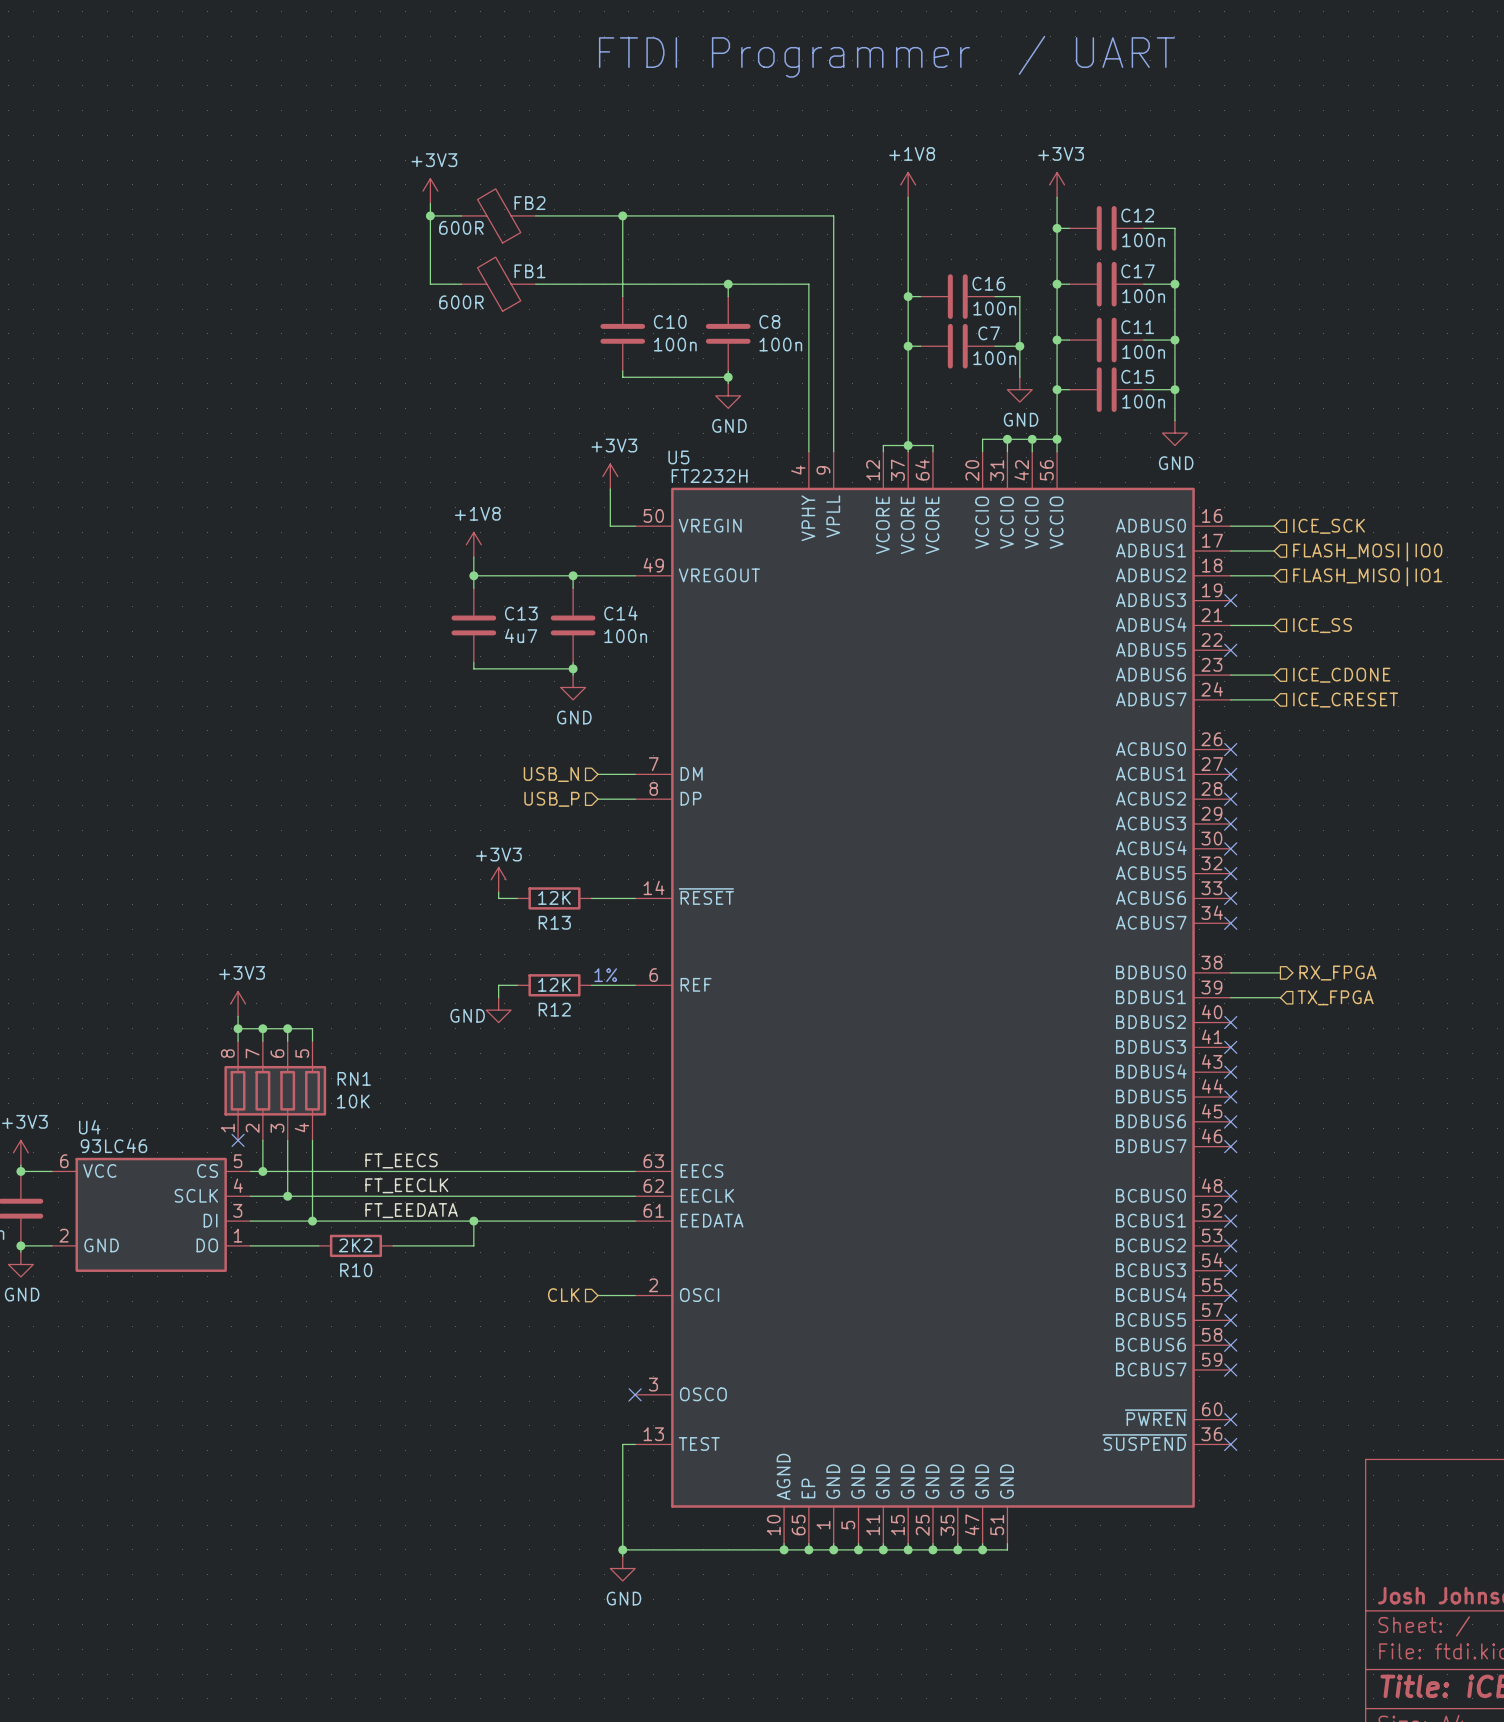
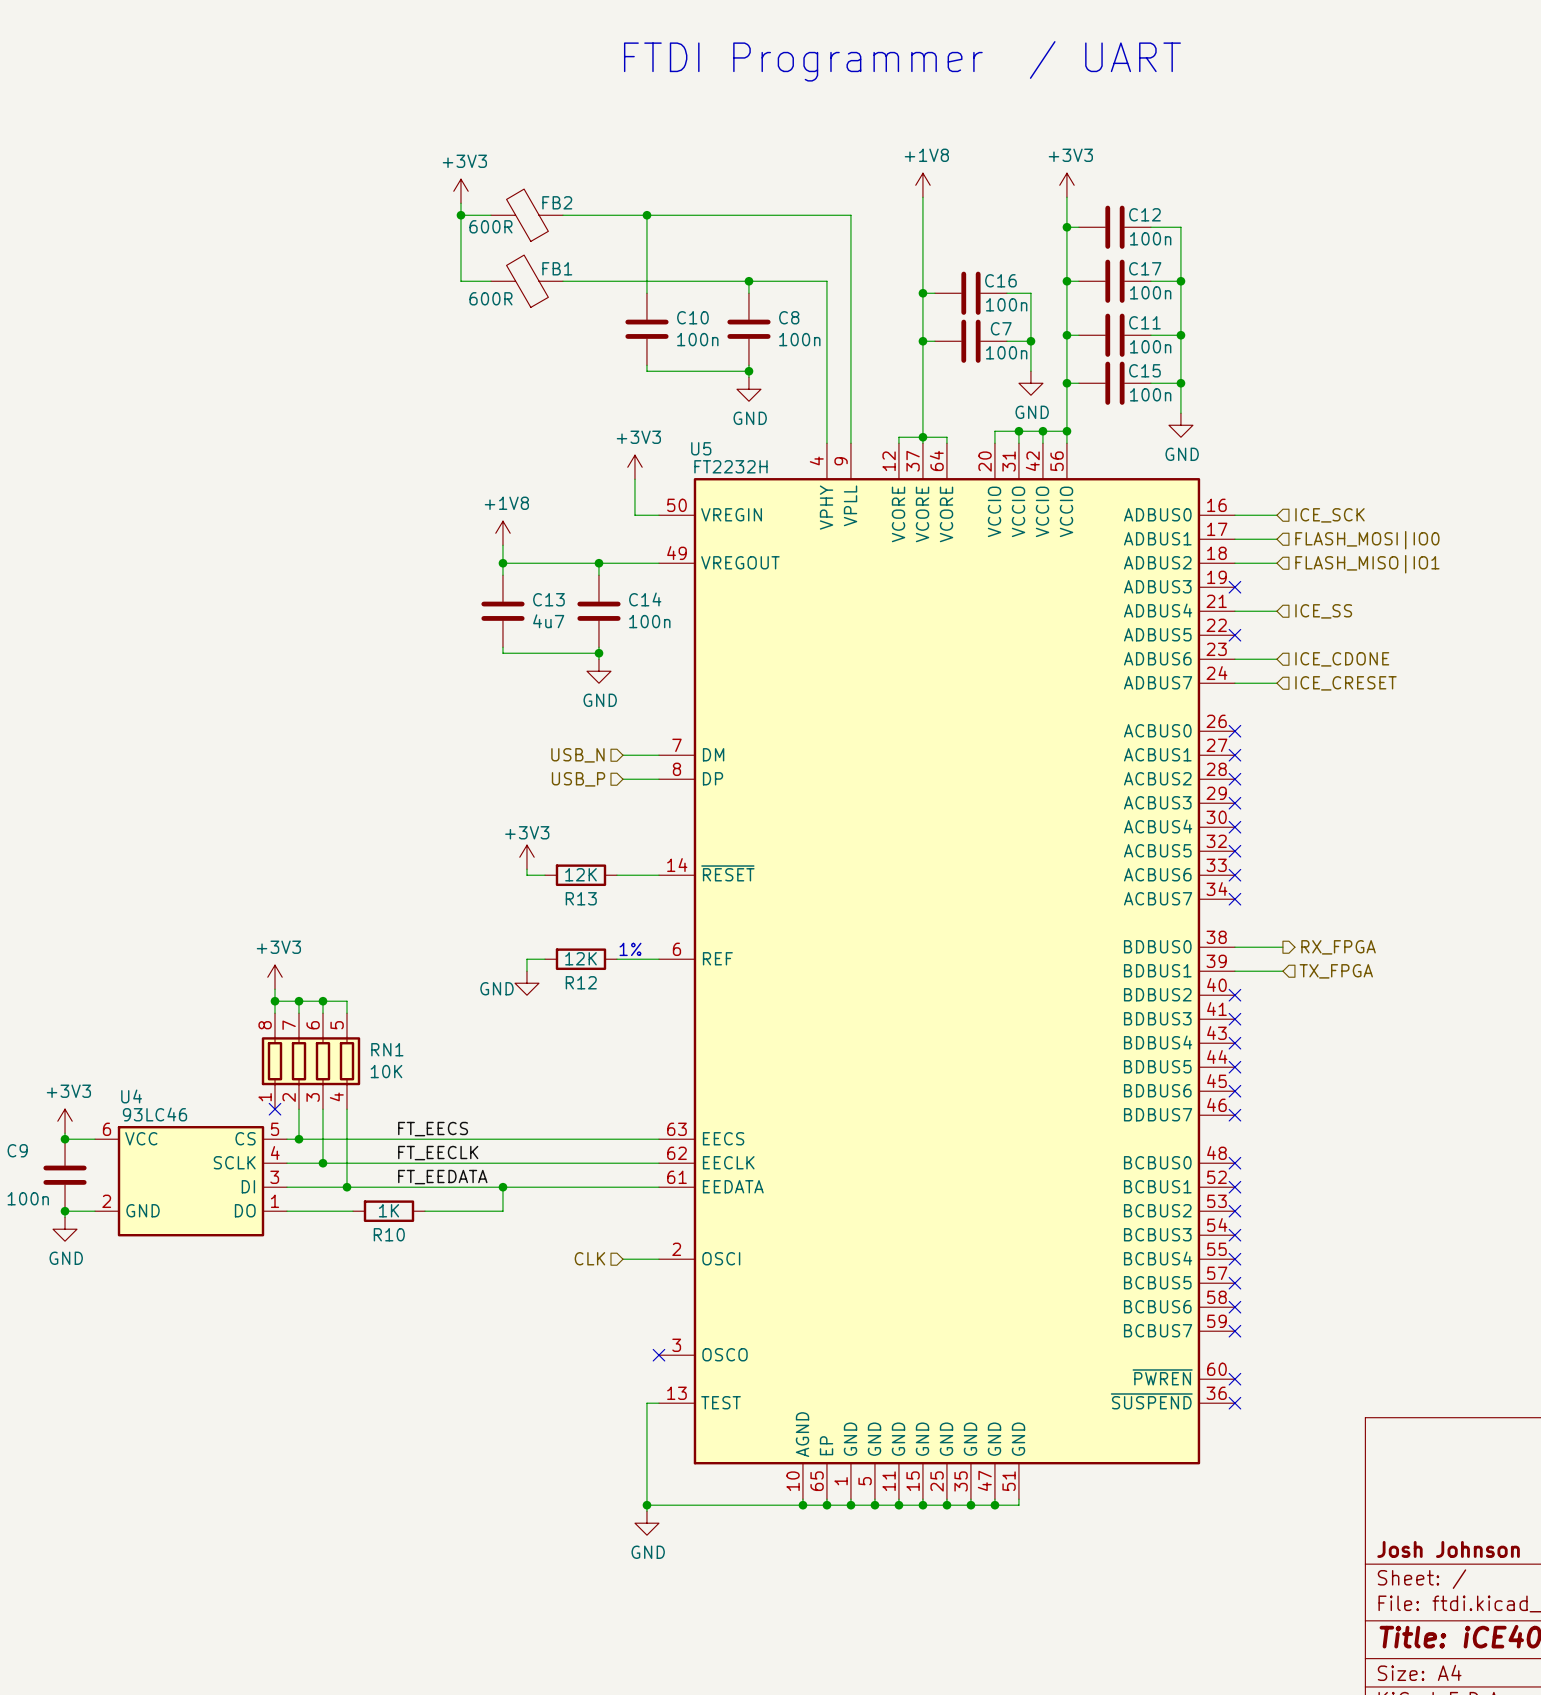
R10 value: 2K2 (355, 1245) -> 1K (388, 1210)

